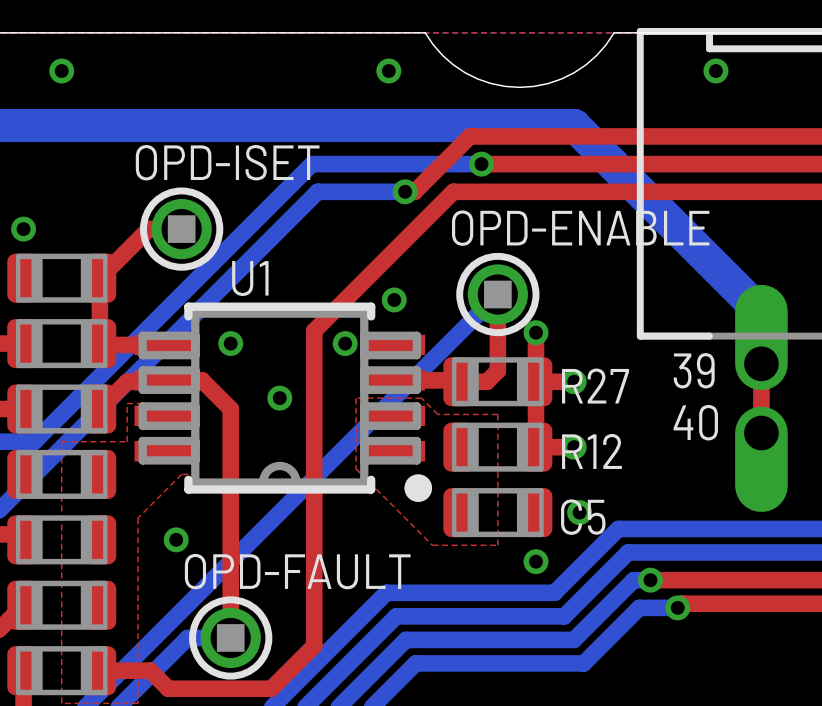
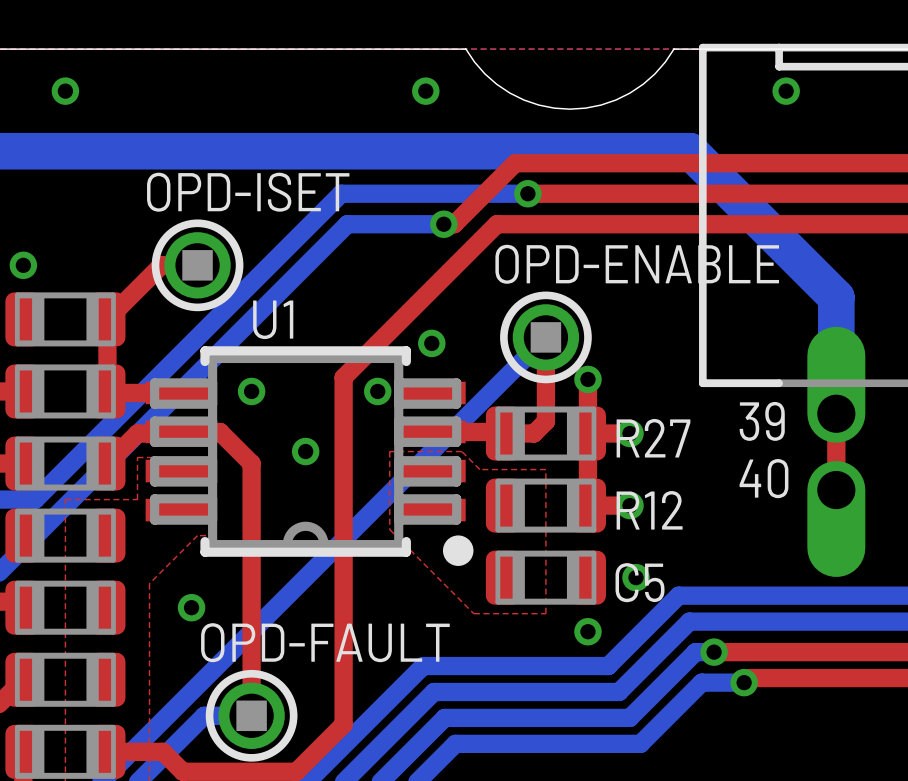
bottom track: (574, 125) (761, 312) -> (630, 151) (690, 151) (836, 297) (836, 357)

